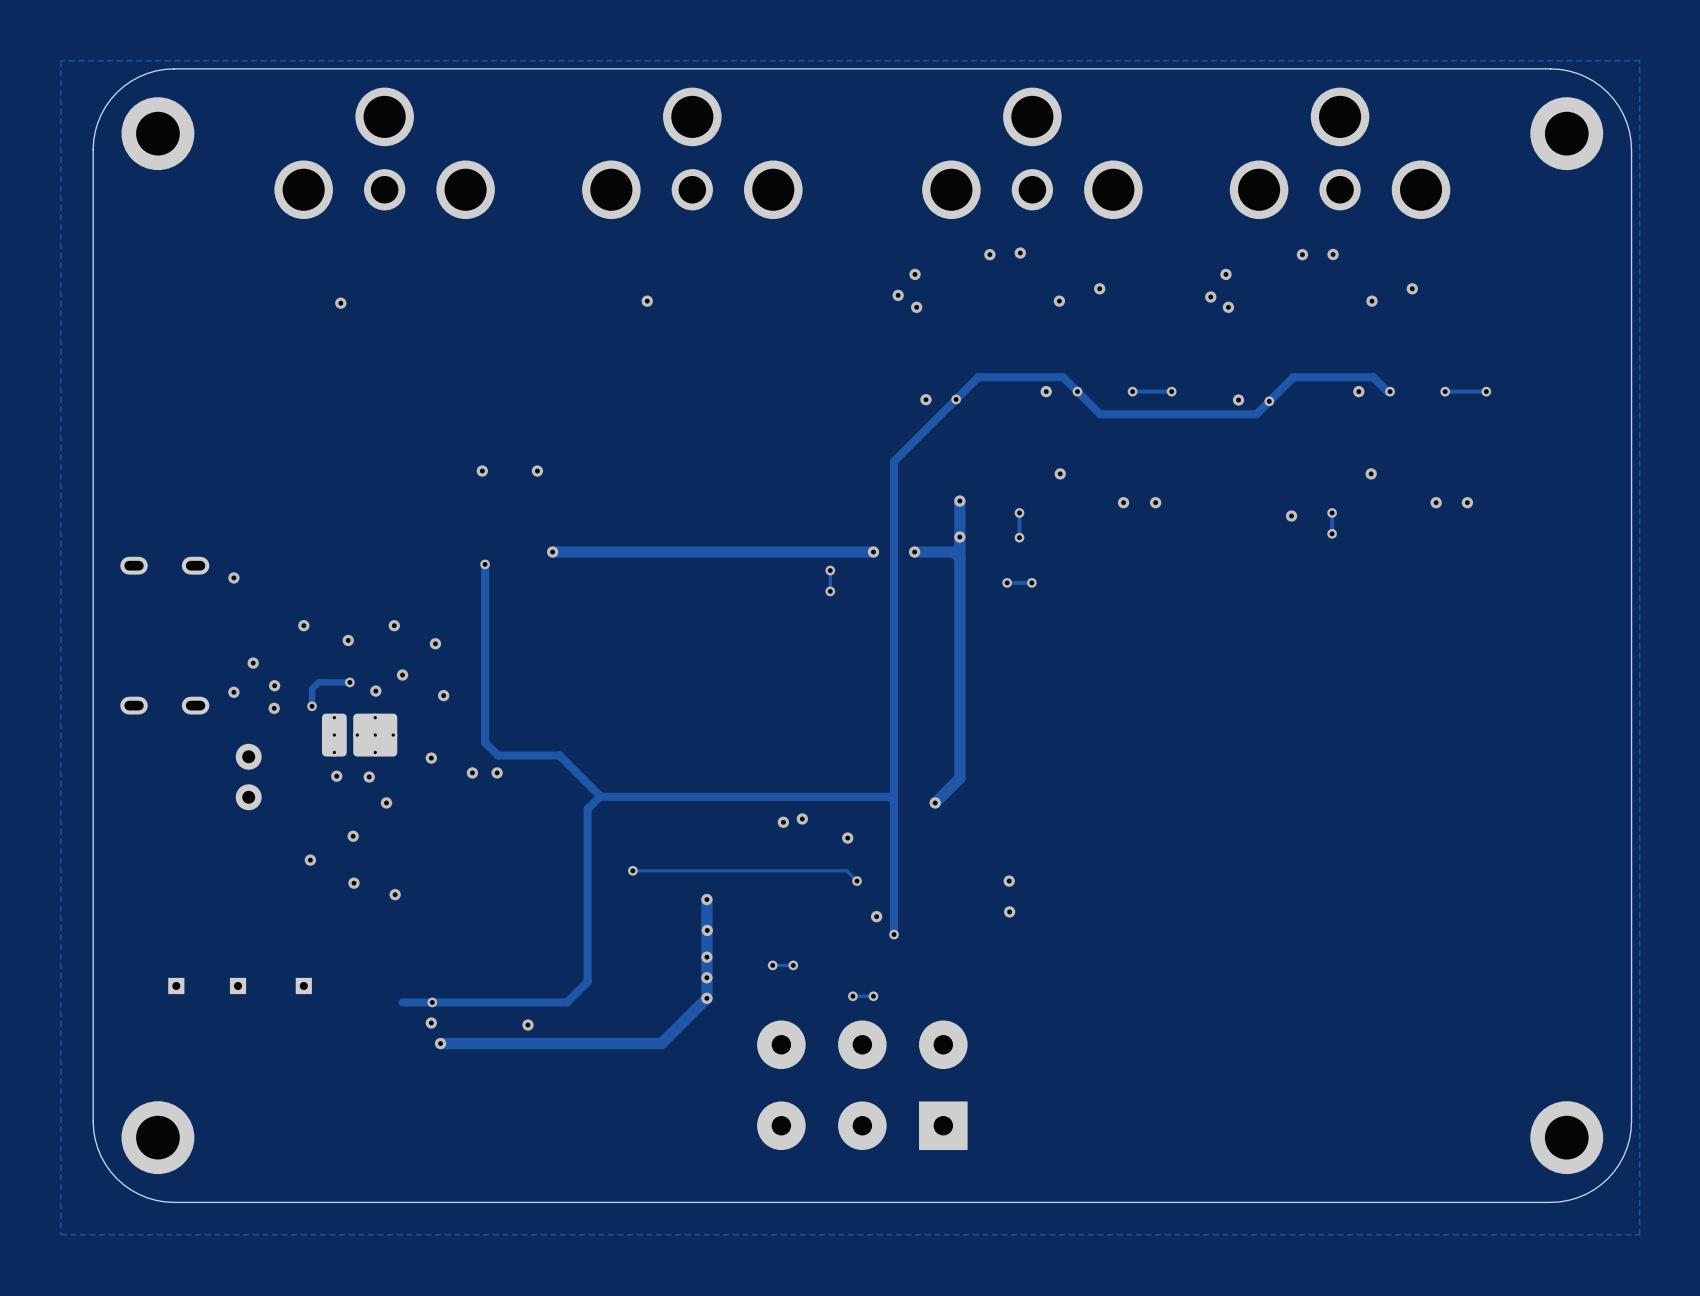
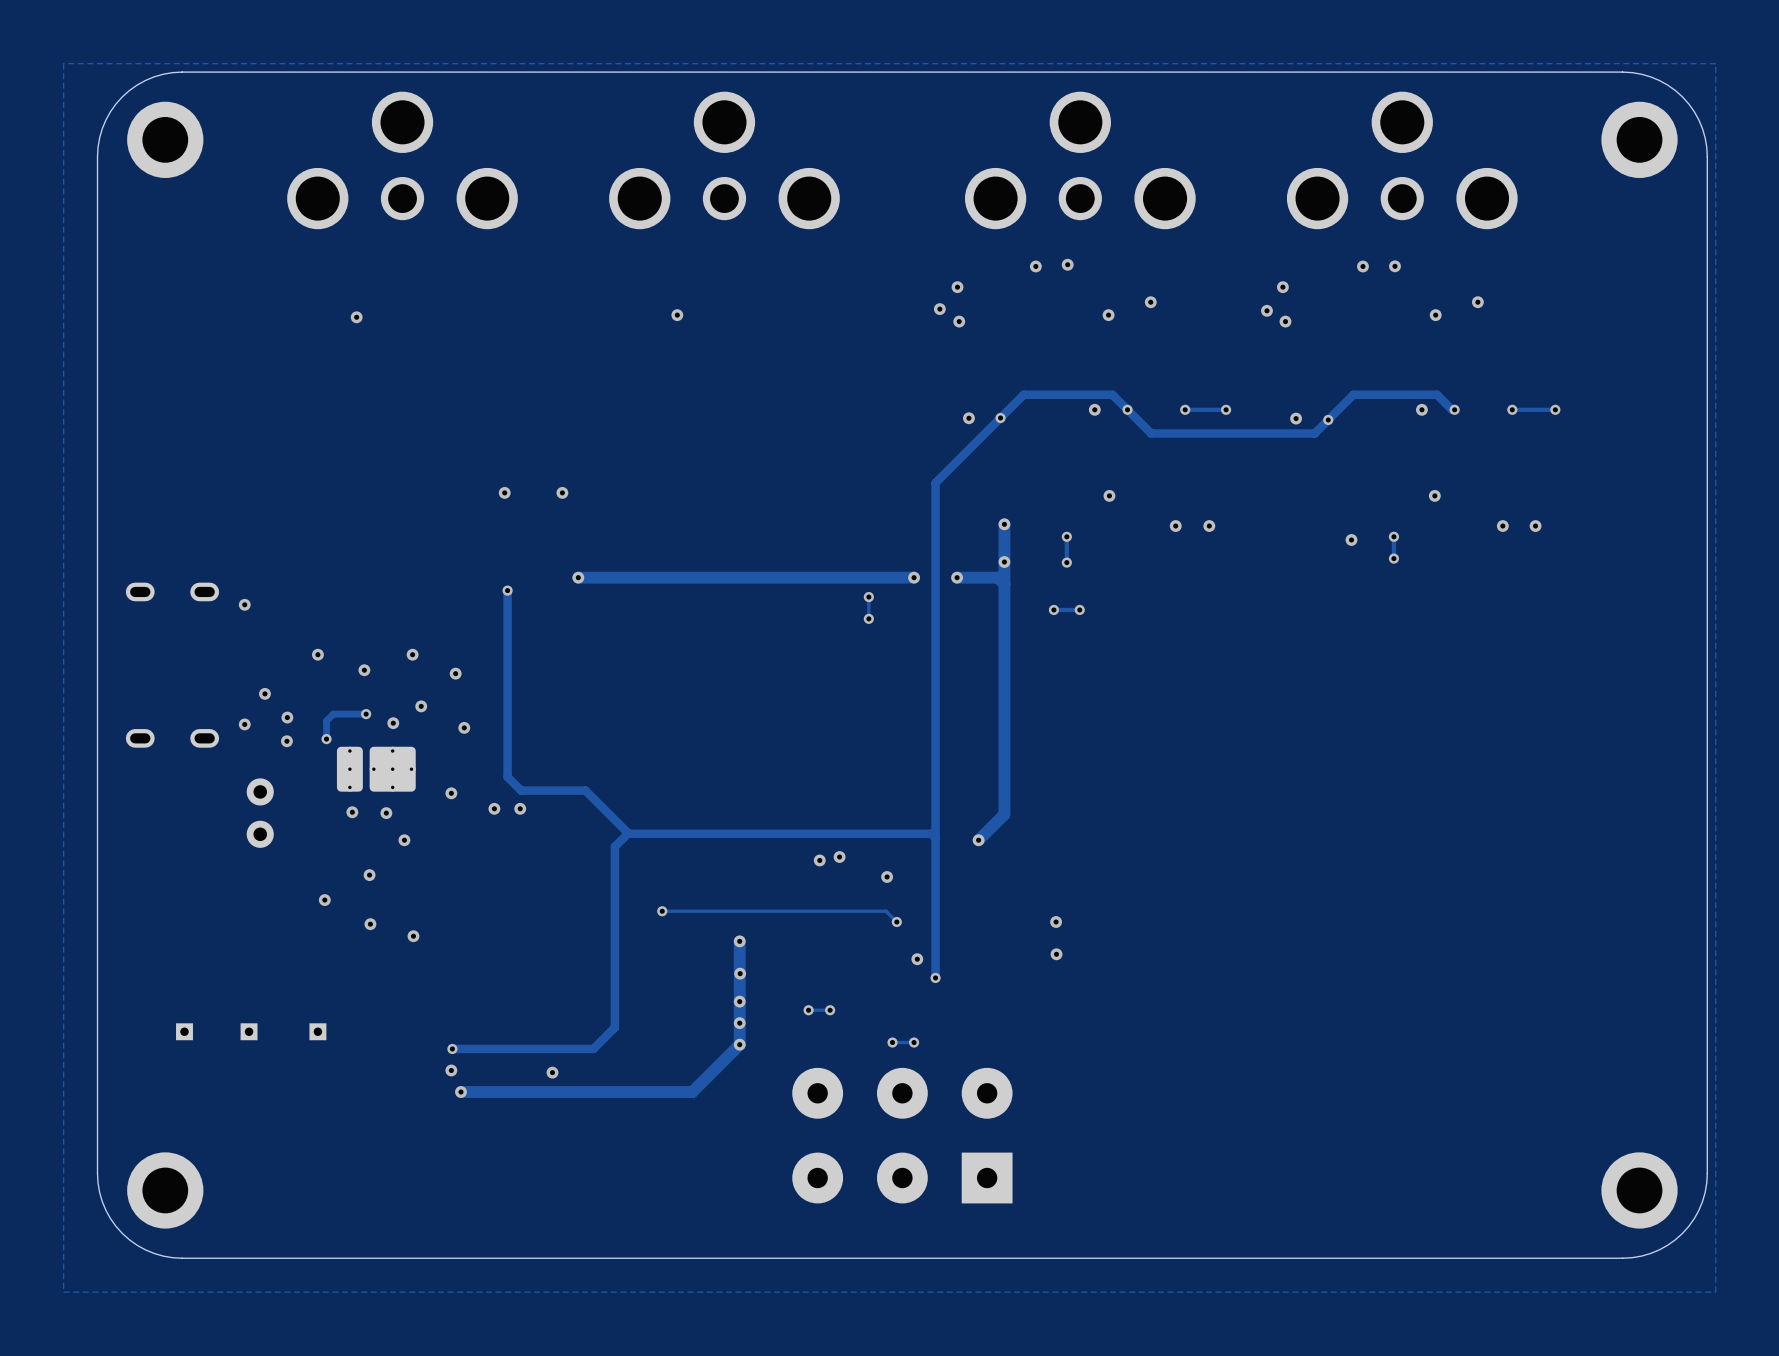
track: (432, 1002) (402, 1002) -> none

